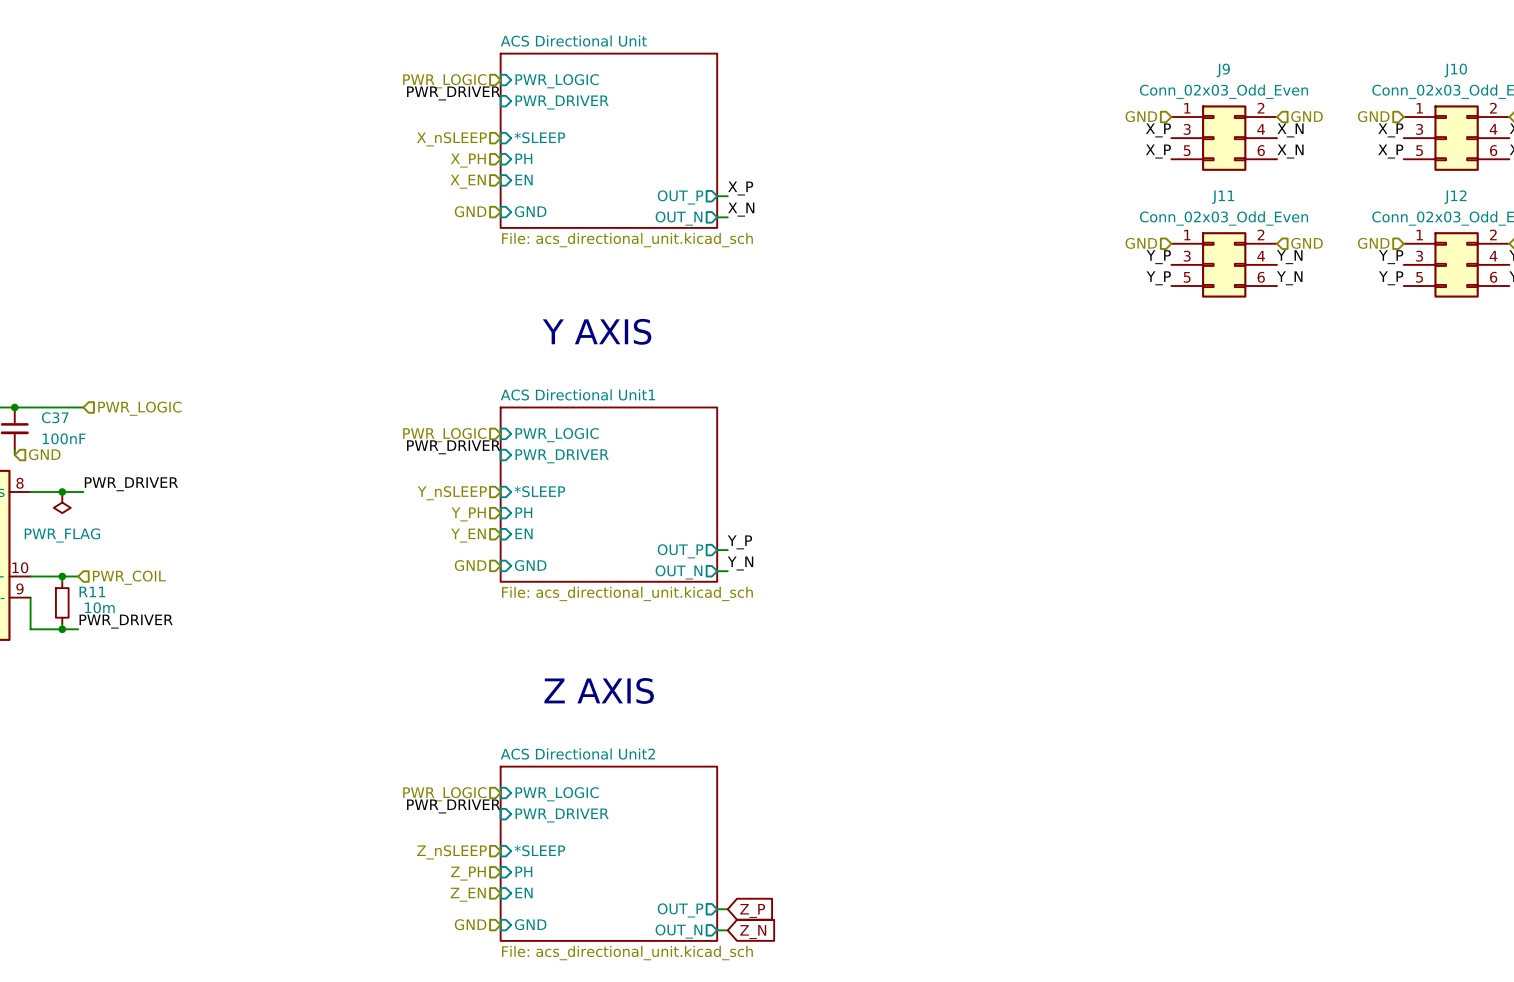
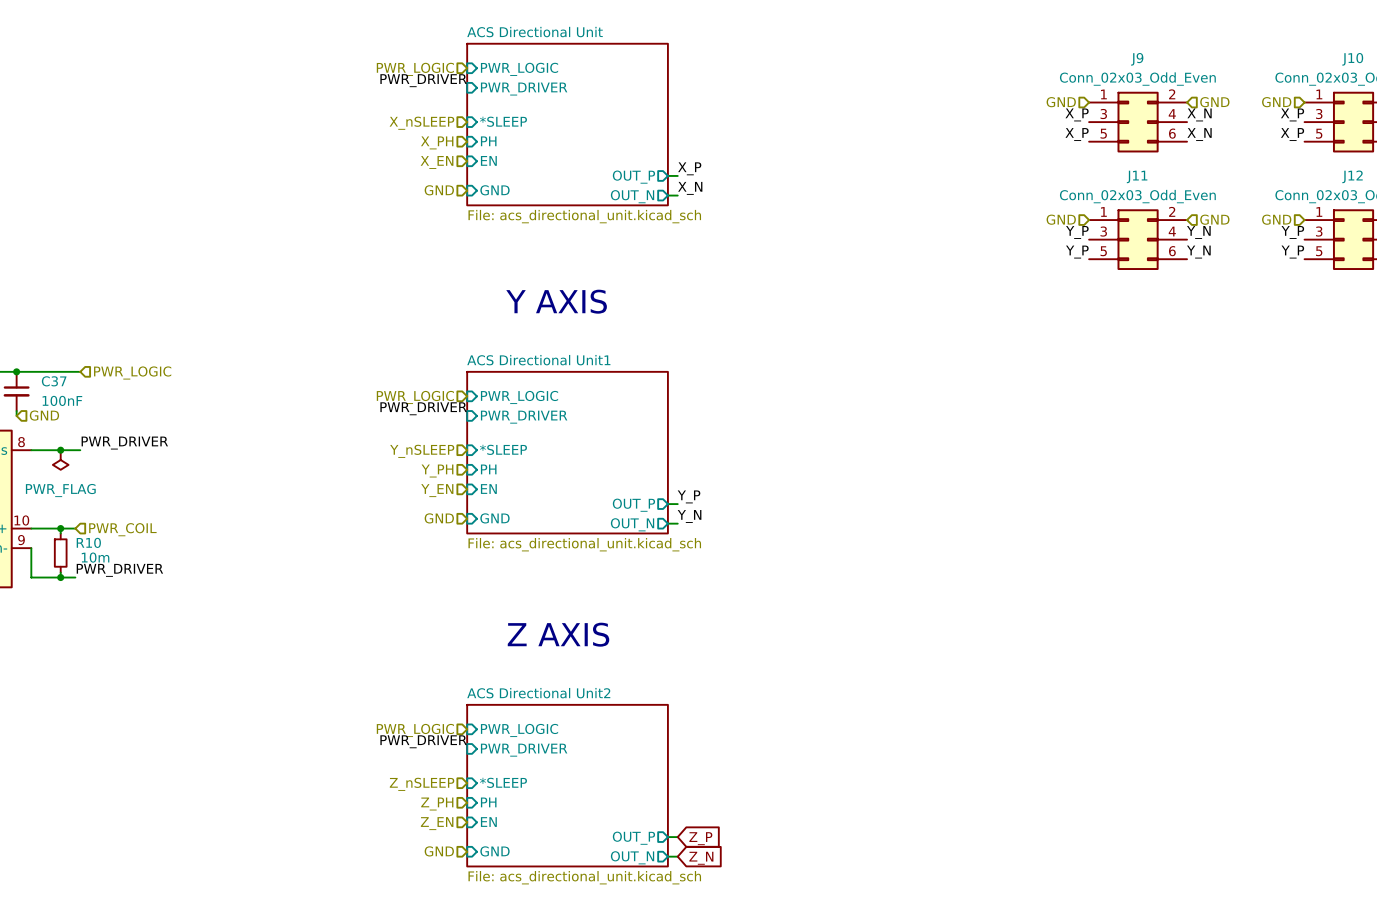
R11 name: R11 (92, 591) -> R10 (88, 542)

